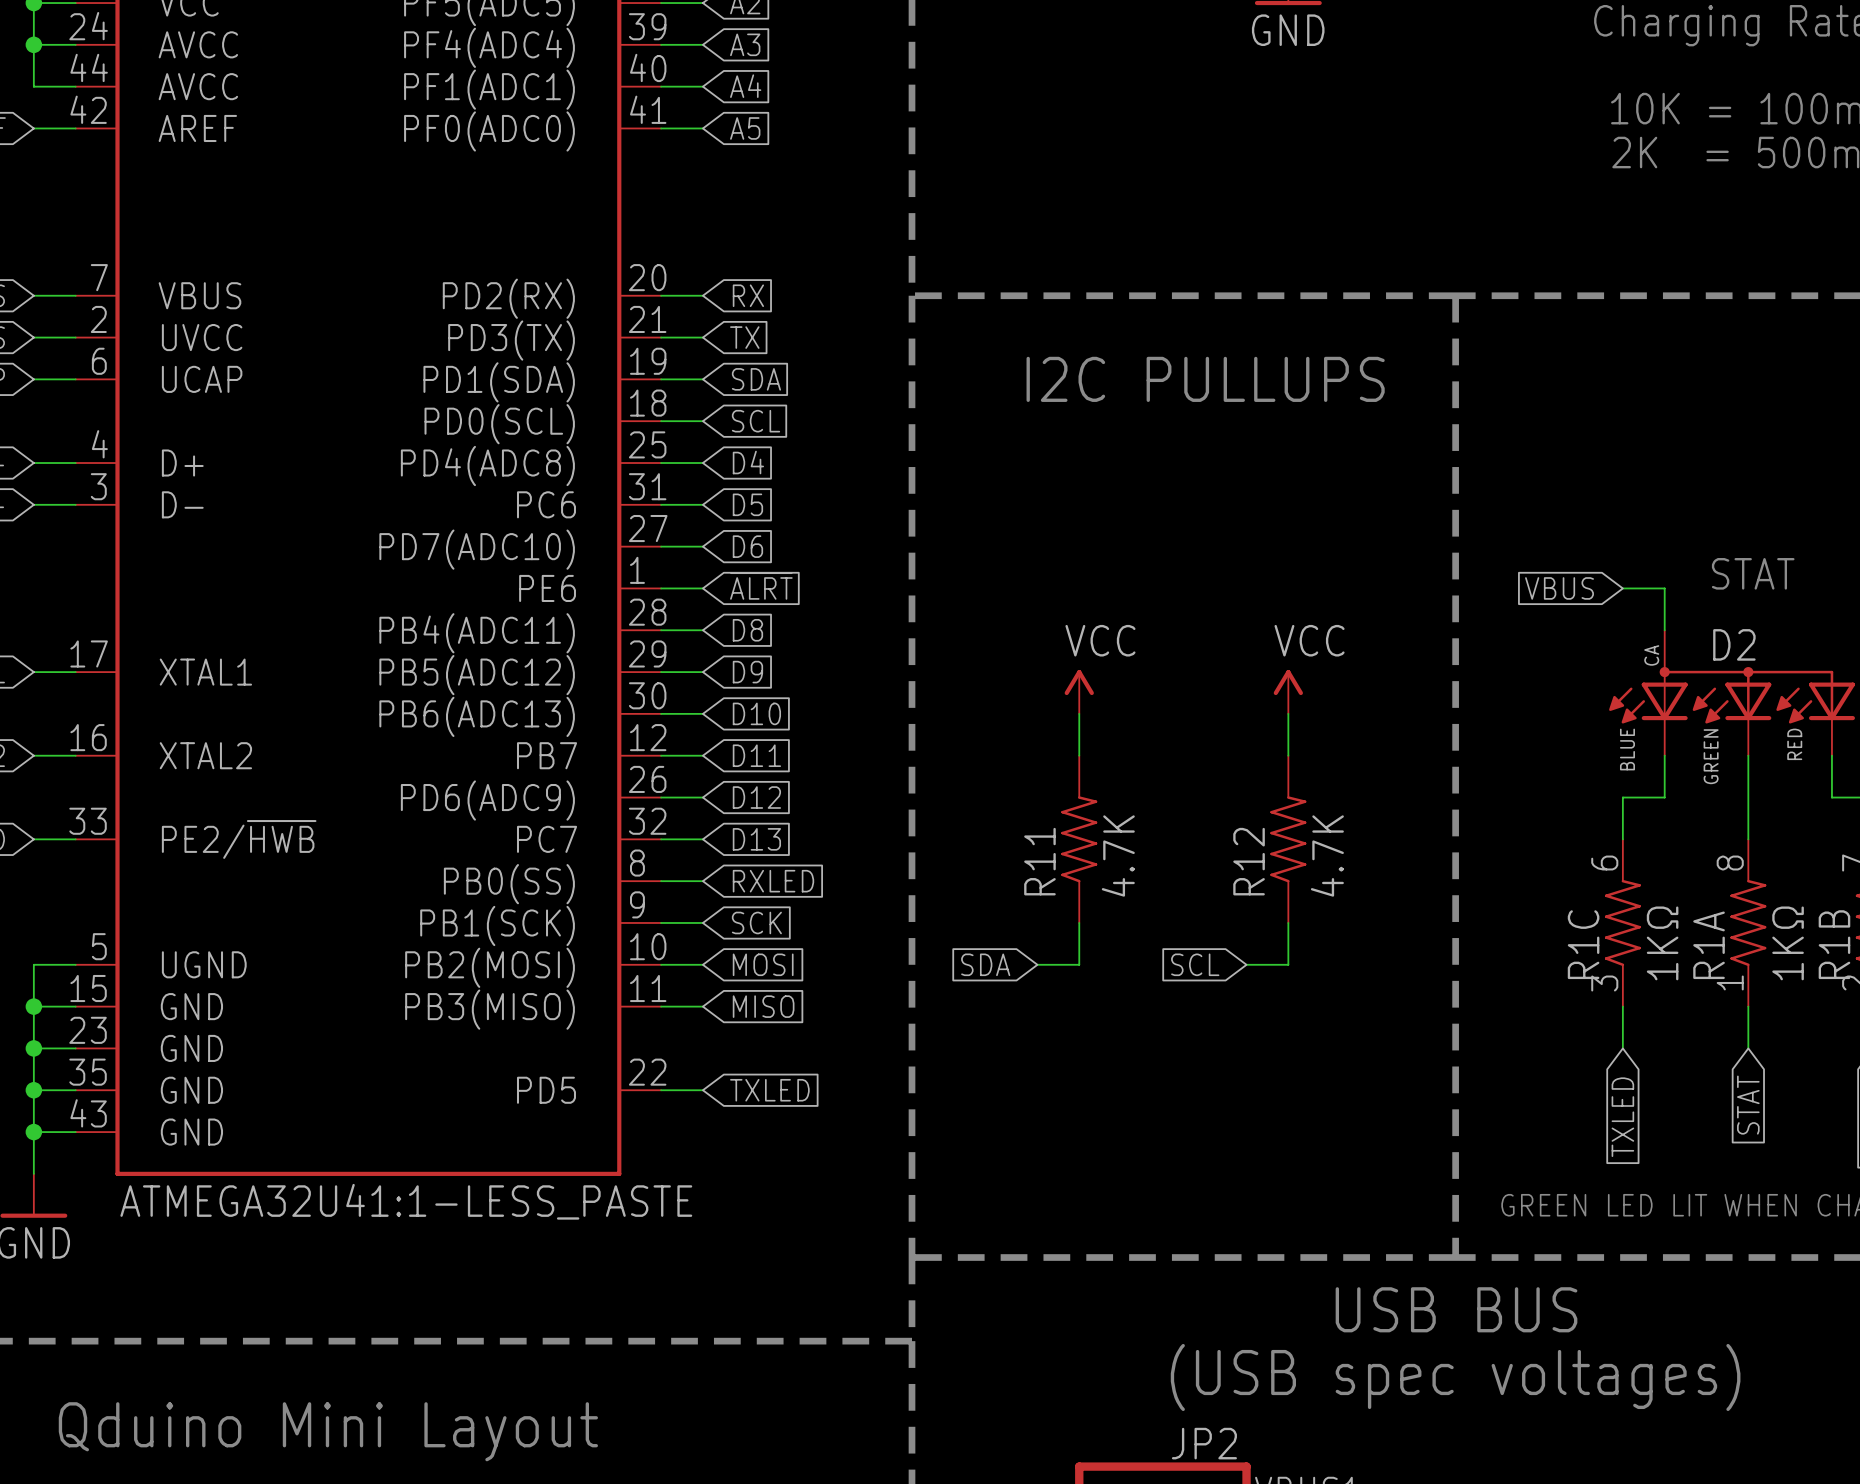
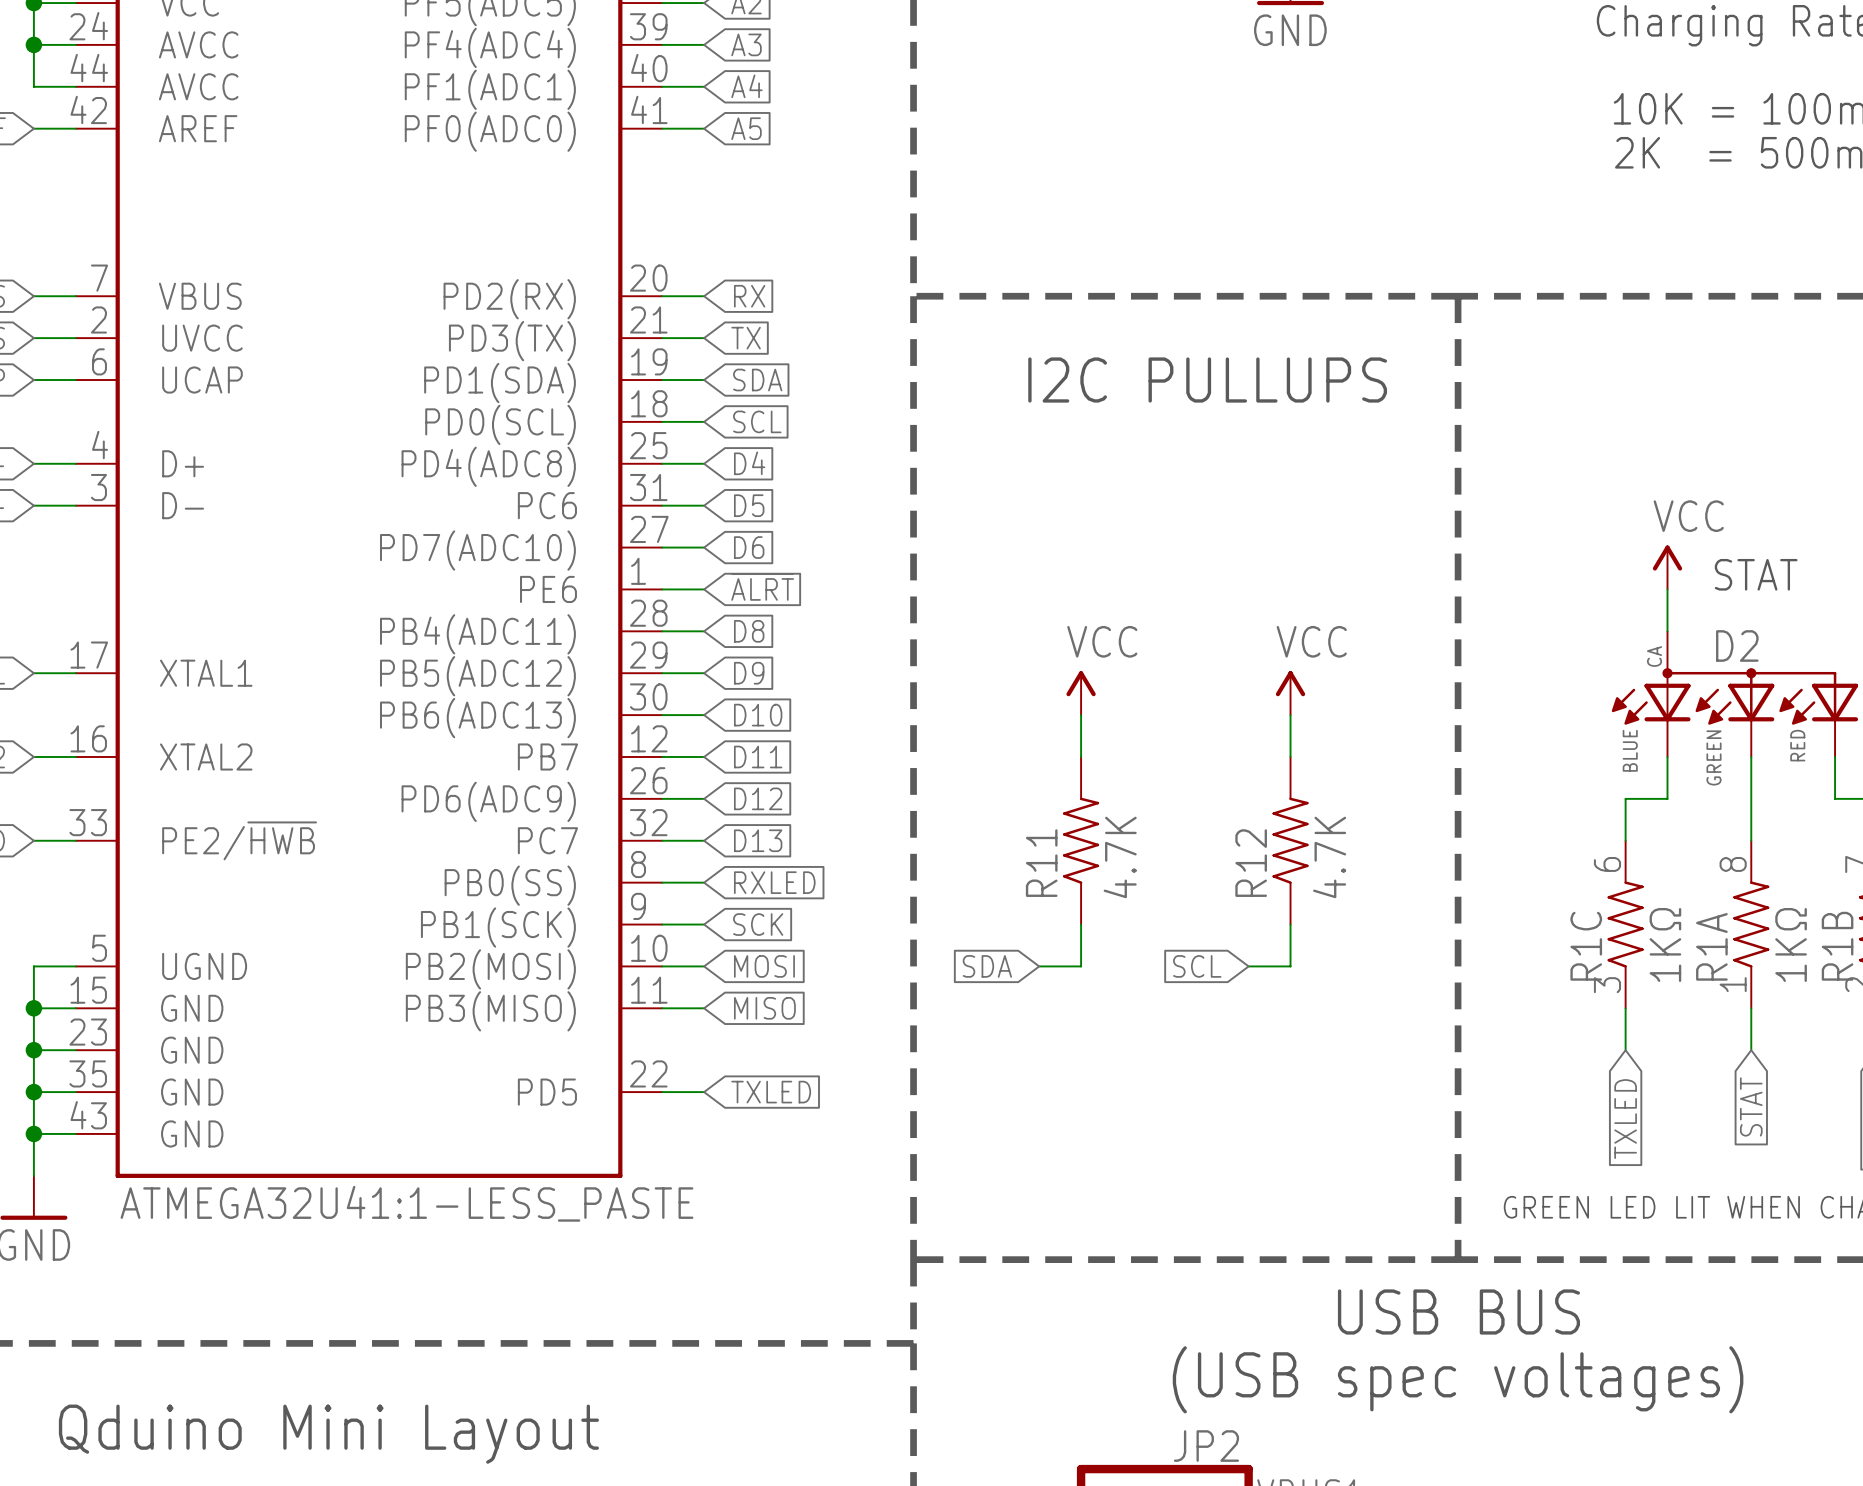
power symbol: none -> VCC (1667, 567)
global label: VBUS (1559, 588) -> none
wire: (1622, 588) (1664, 588) -> none

